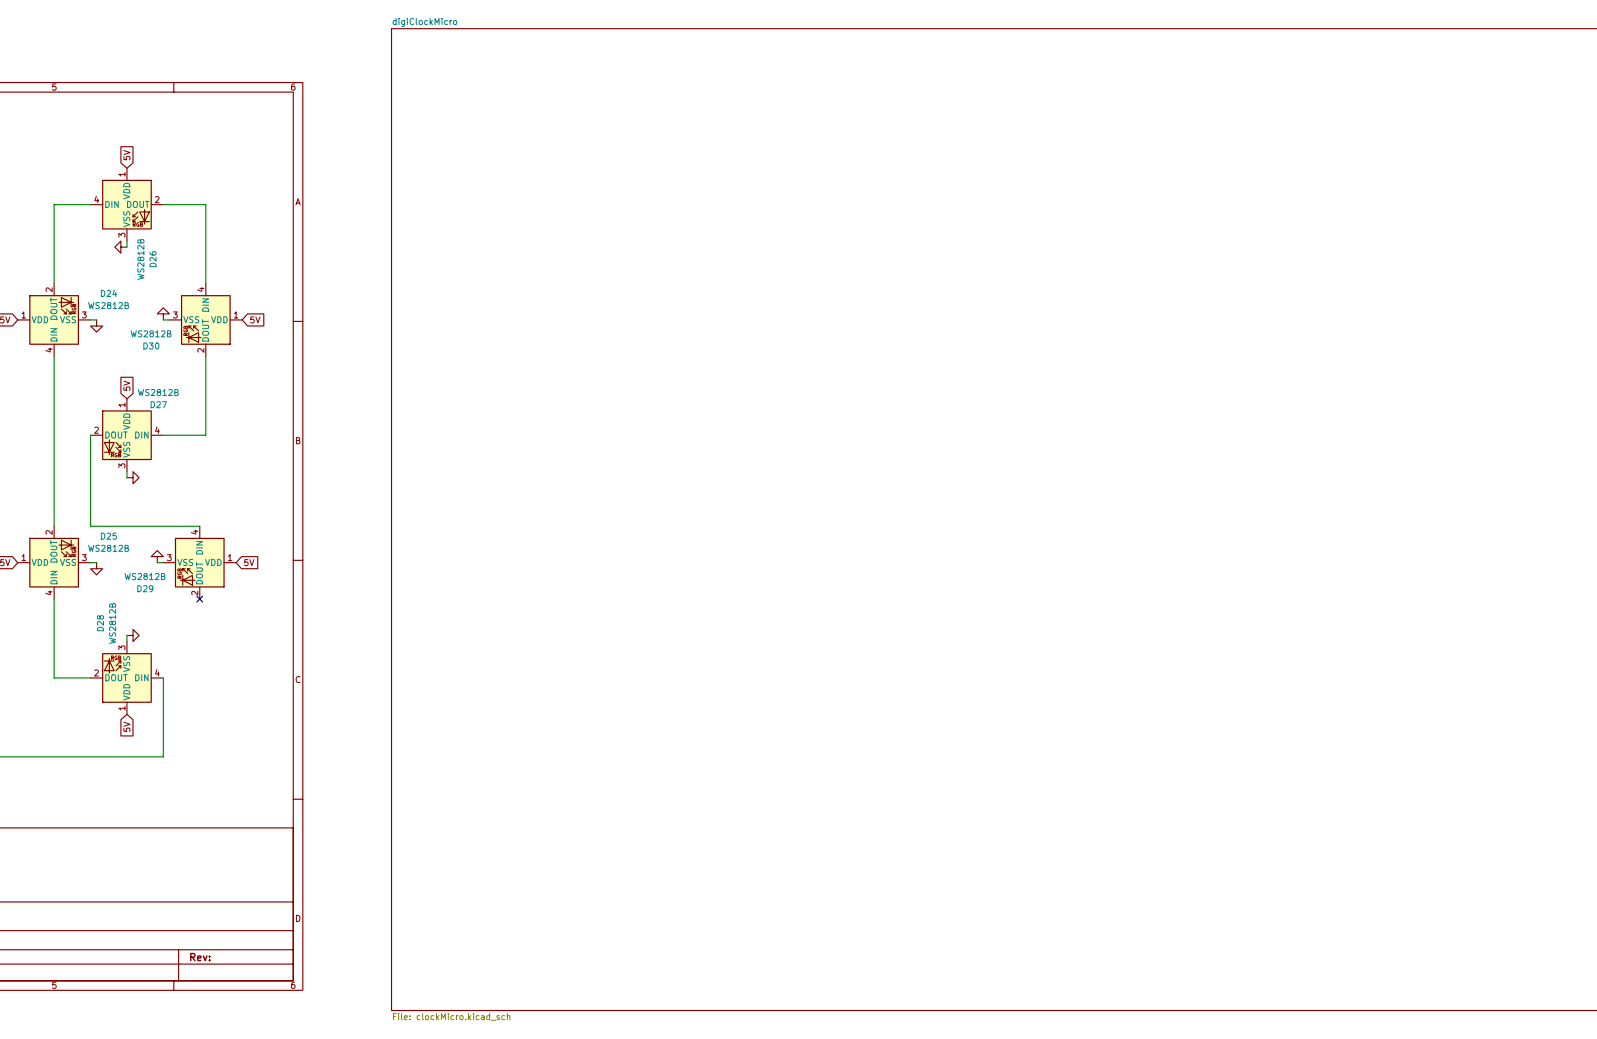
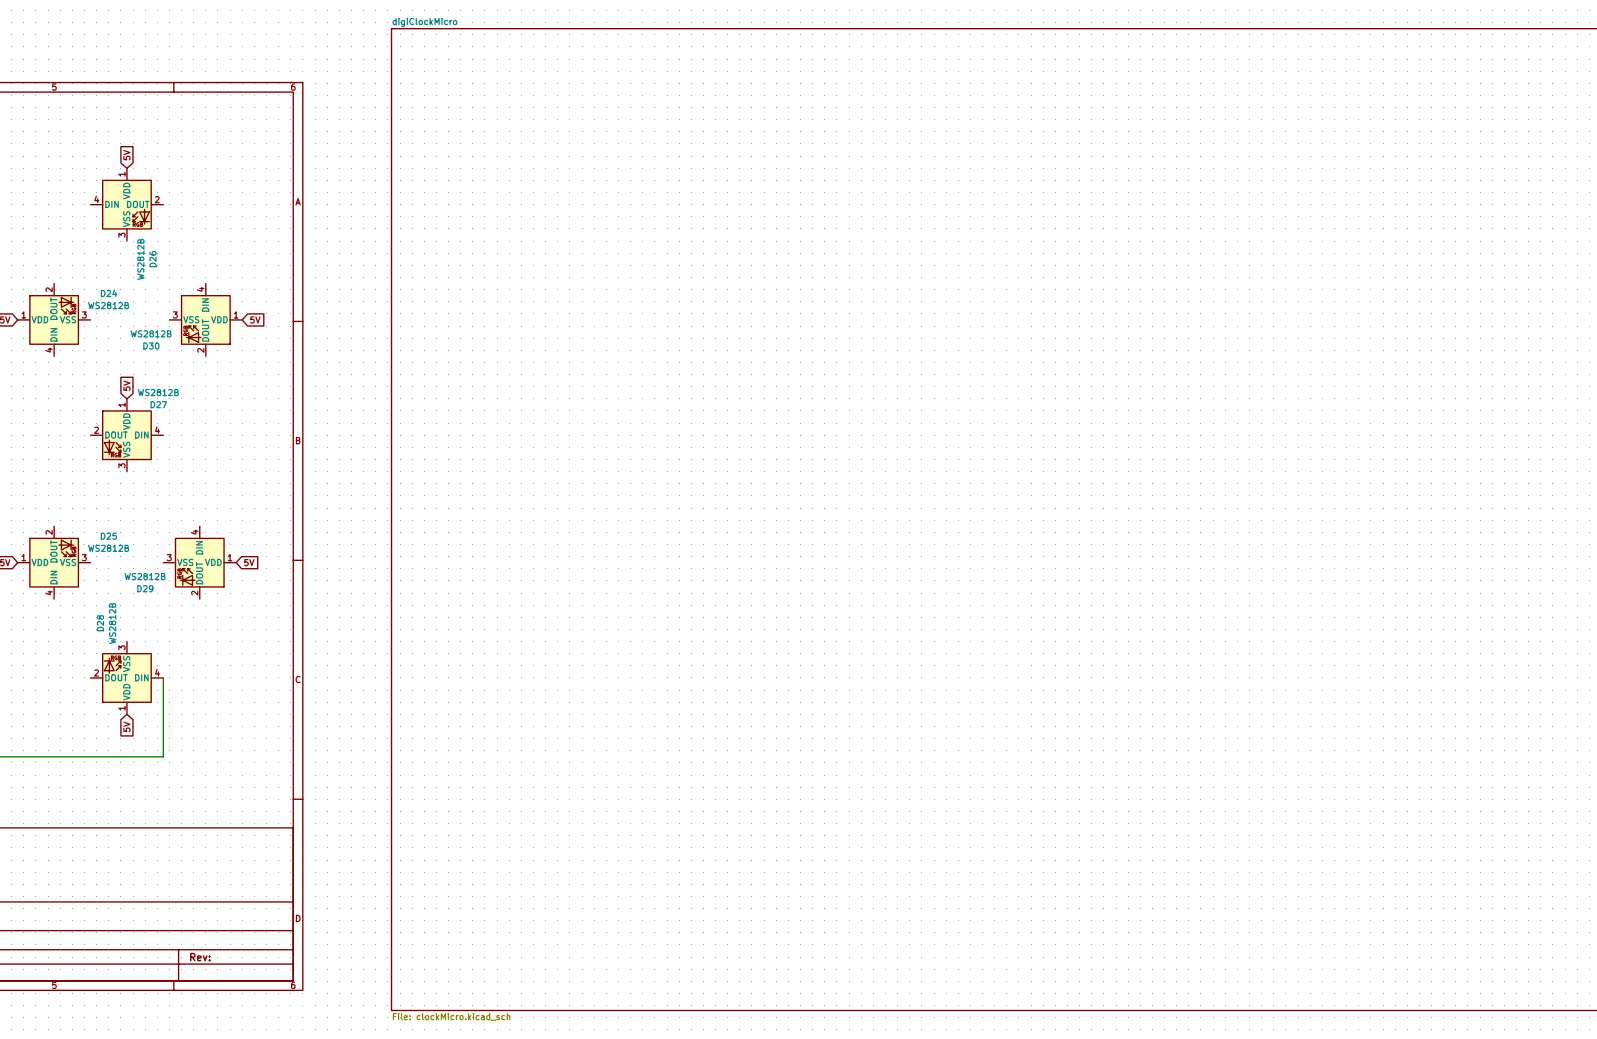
wire: (90, 204) (54, 204) (54, 283) -> none
wire: (163, 204) (205, 204) (205, 283) -> none
wire: (126, 241) (126, 247) -> none
power symbol: (120, 247) -> none
power symbol: (163, 313) -> none
wire: (90, 319) (96, 319) -> none
wire: (163, 319) (169, 319) -> none
power symbol: (96, 326) -> none
wire: (54, 356) (54, 526) -> none
wire: (205, 356) (205, 435) (163, 435) -> none
wire: (90, 435) (90, 526) (199, 526) -> none
wire: (126, 471) (126, 477) -> none
power symbol: (133, 477) -> none
power symbol: (157, 556) -> none
wire: (90, 562) (96, 562) -> none
wire: (157, 562) (163, 562) -> none
power symbol: (96, 568) -> none
wire: (54, 599) (54, 677) (90, 677) -> none
no-connect mark: (199, 599) -> none
wire: (126, 635) (126, 641) -> none
power symbol: (133, 635) -> none

